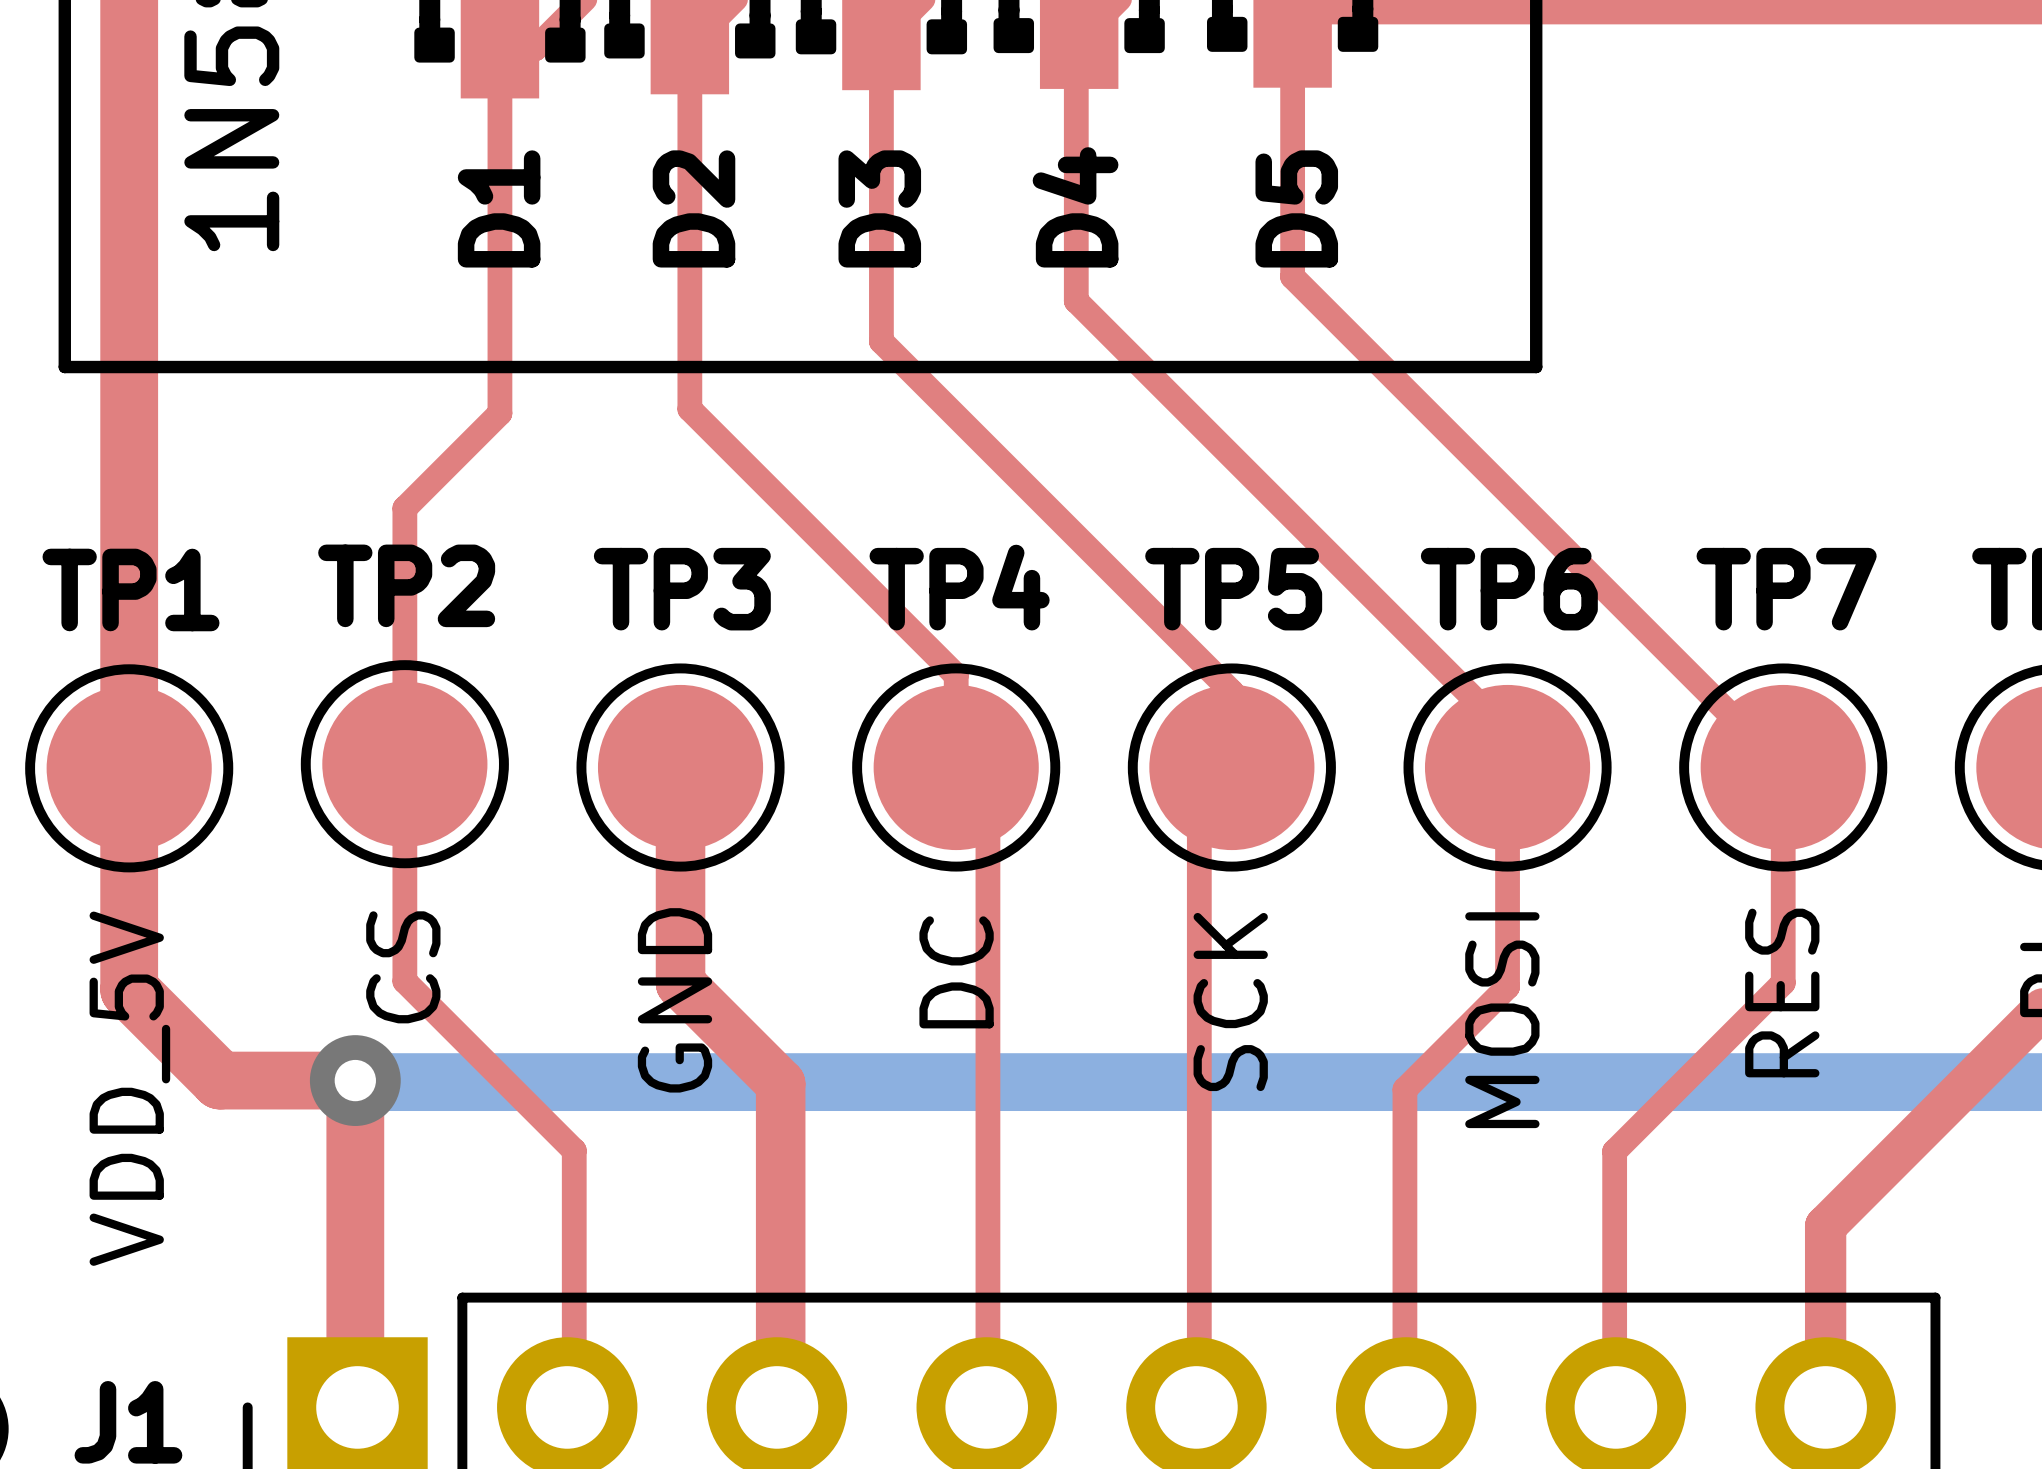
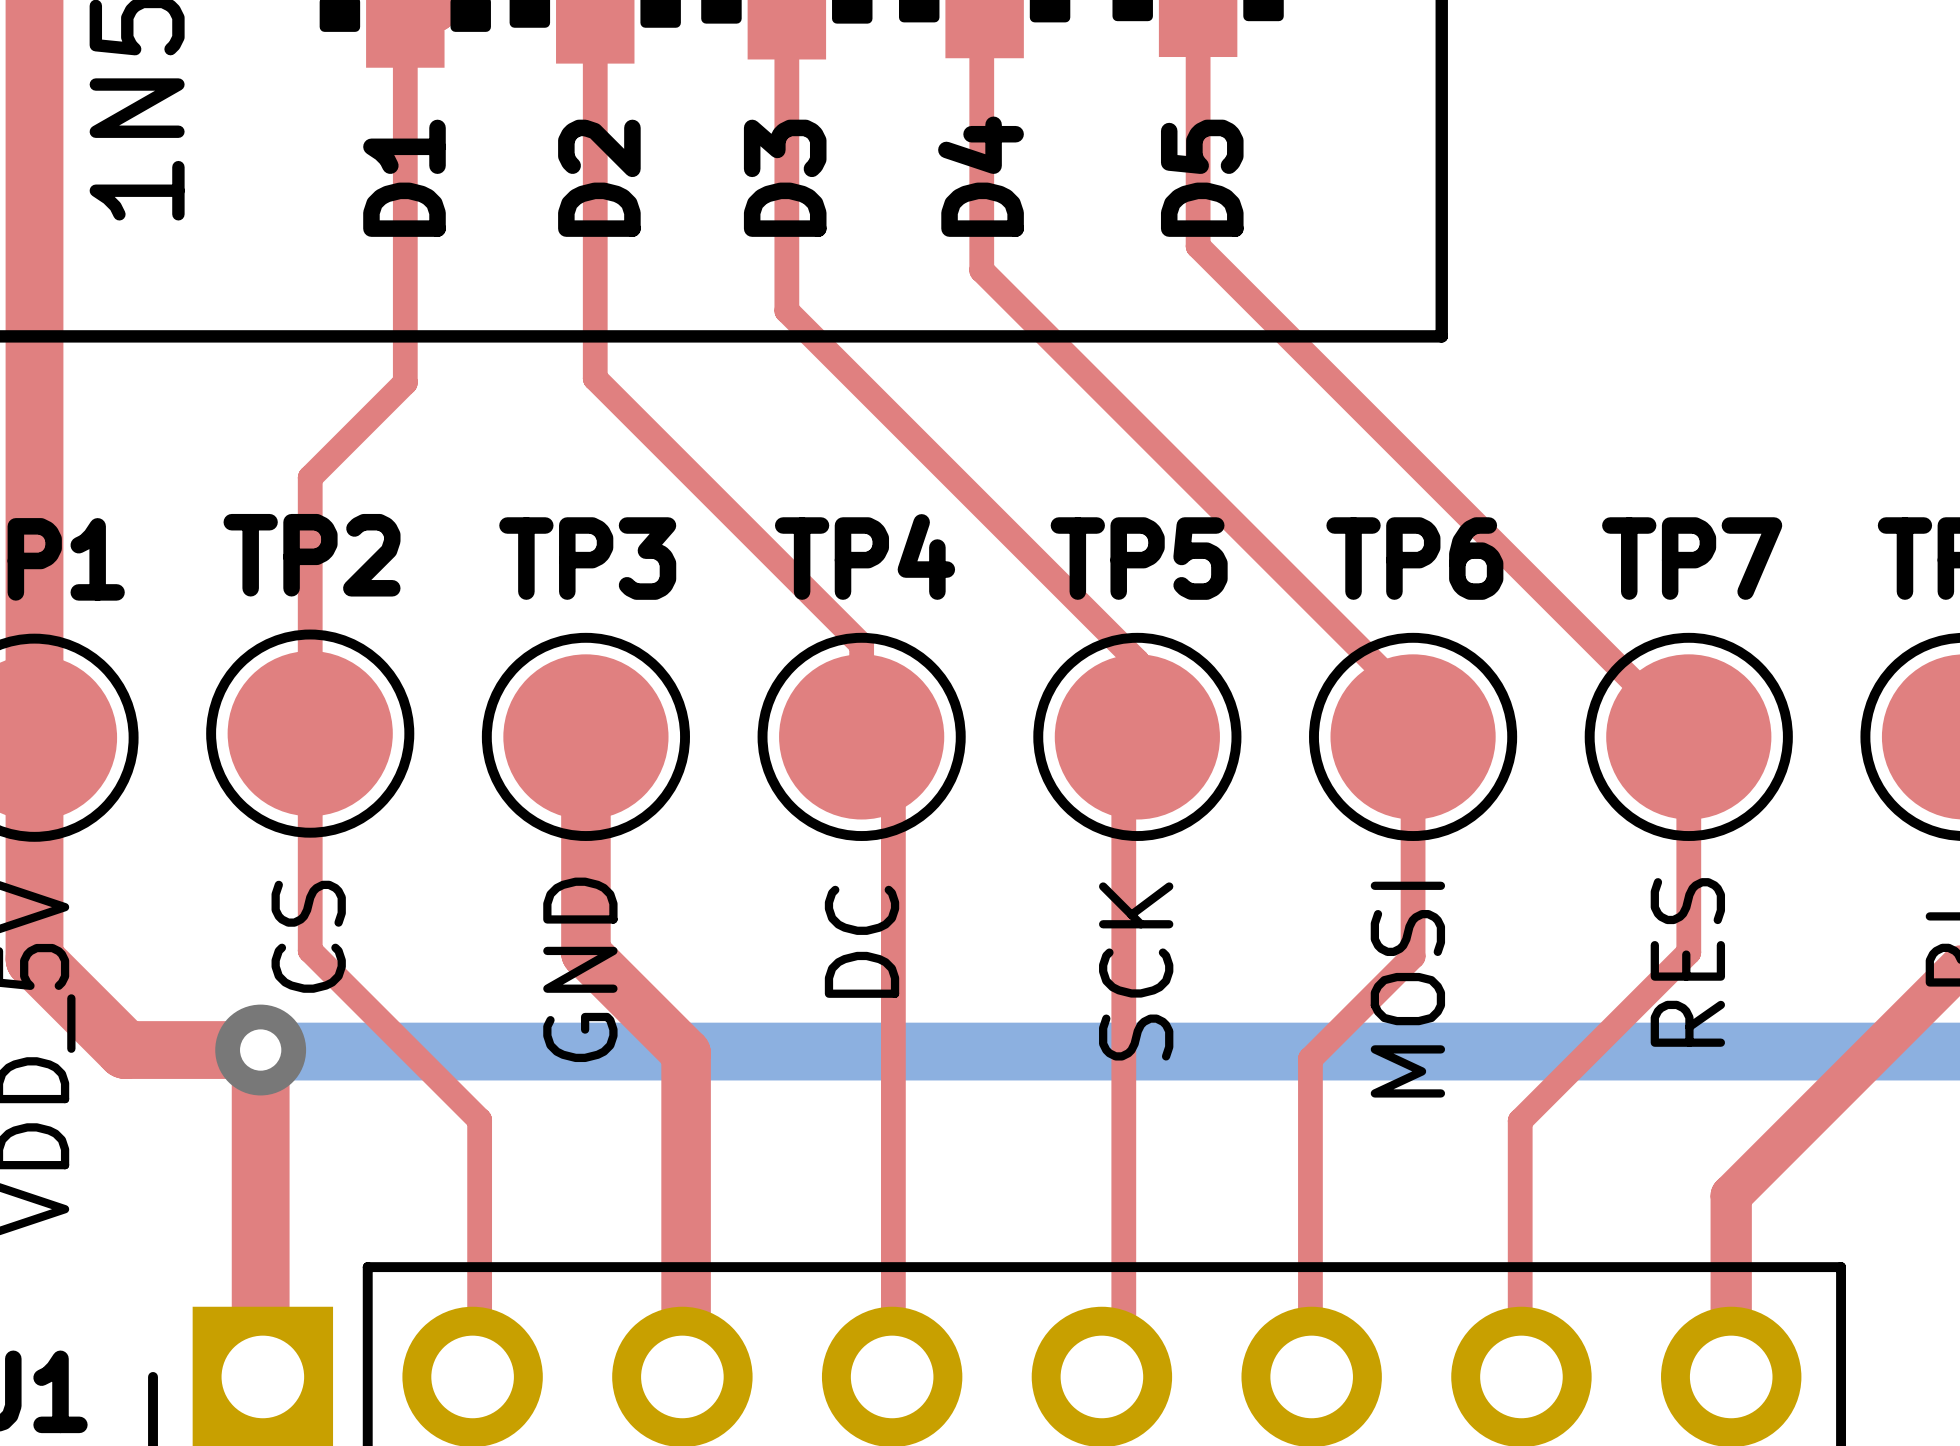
top track: (1218, 781) (1199, 800) (1199, 1404) -> (1123, 750) (1123, 1355) (1104, 1374)

